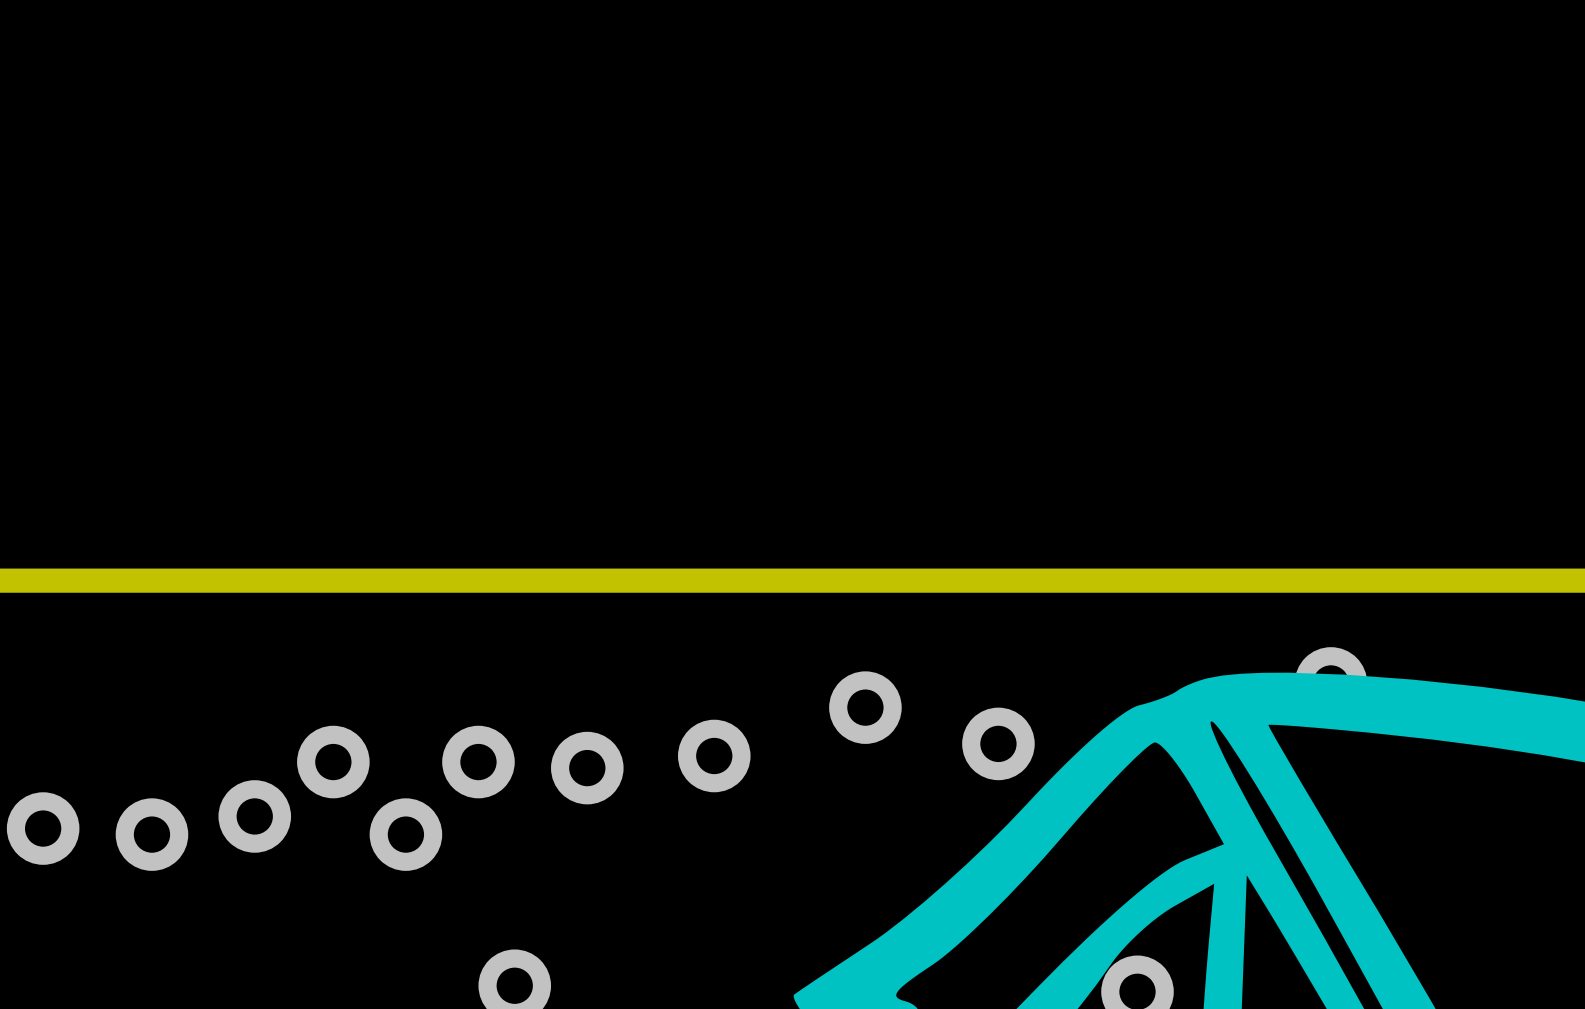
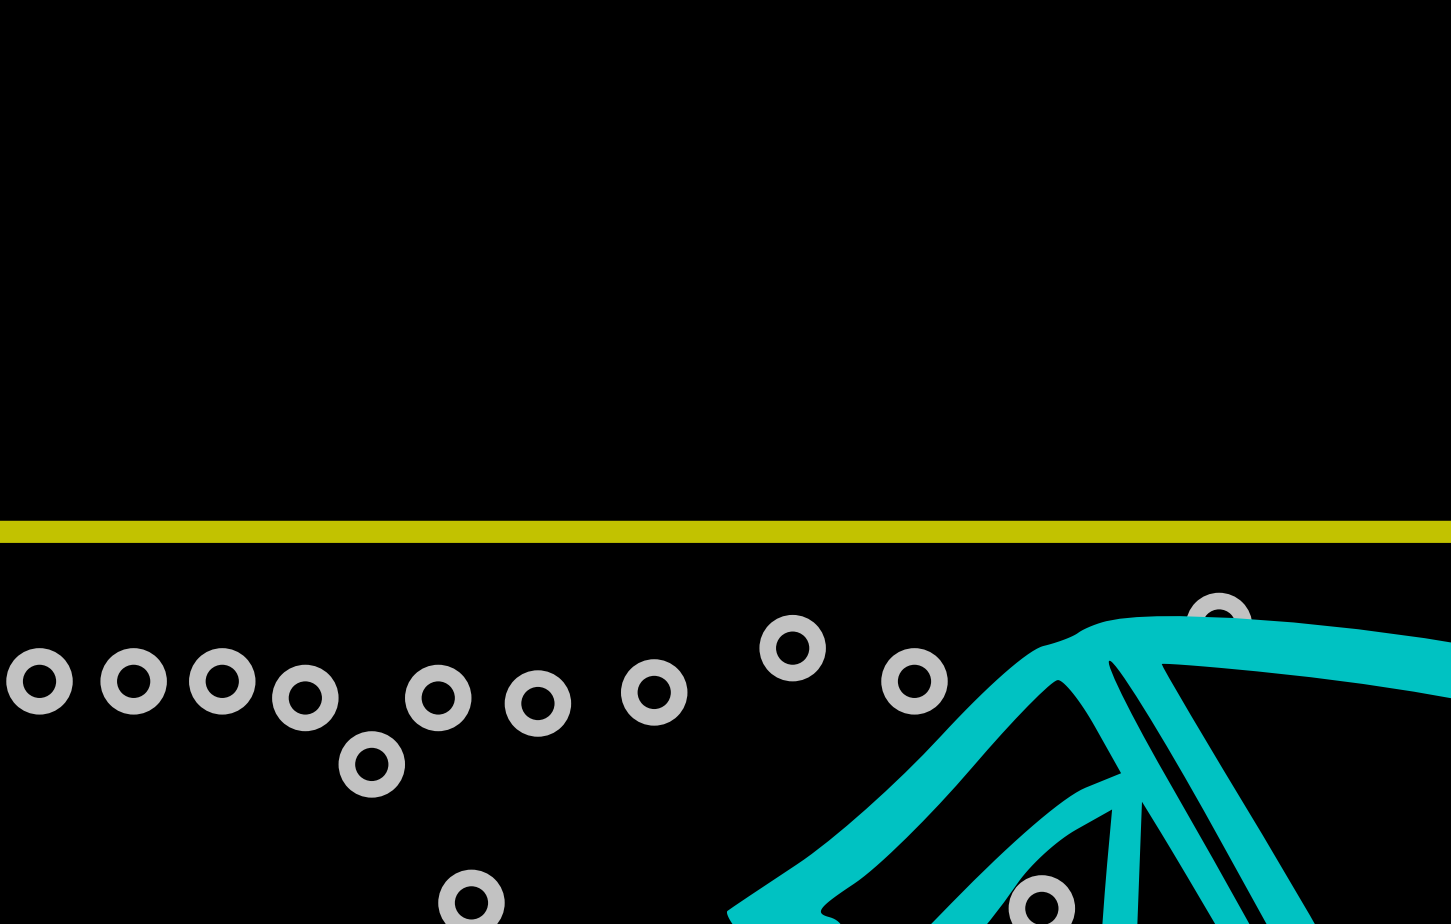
via: none -> (39, 681)
via: none -> (133, 681)
via position: (254, 816) -> (222, 681)
via: (43, 828) -> none
via: (151, 834) -> none

